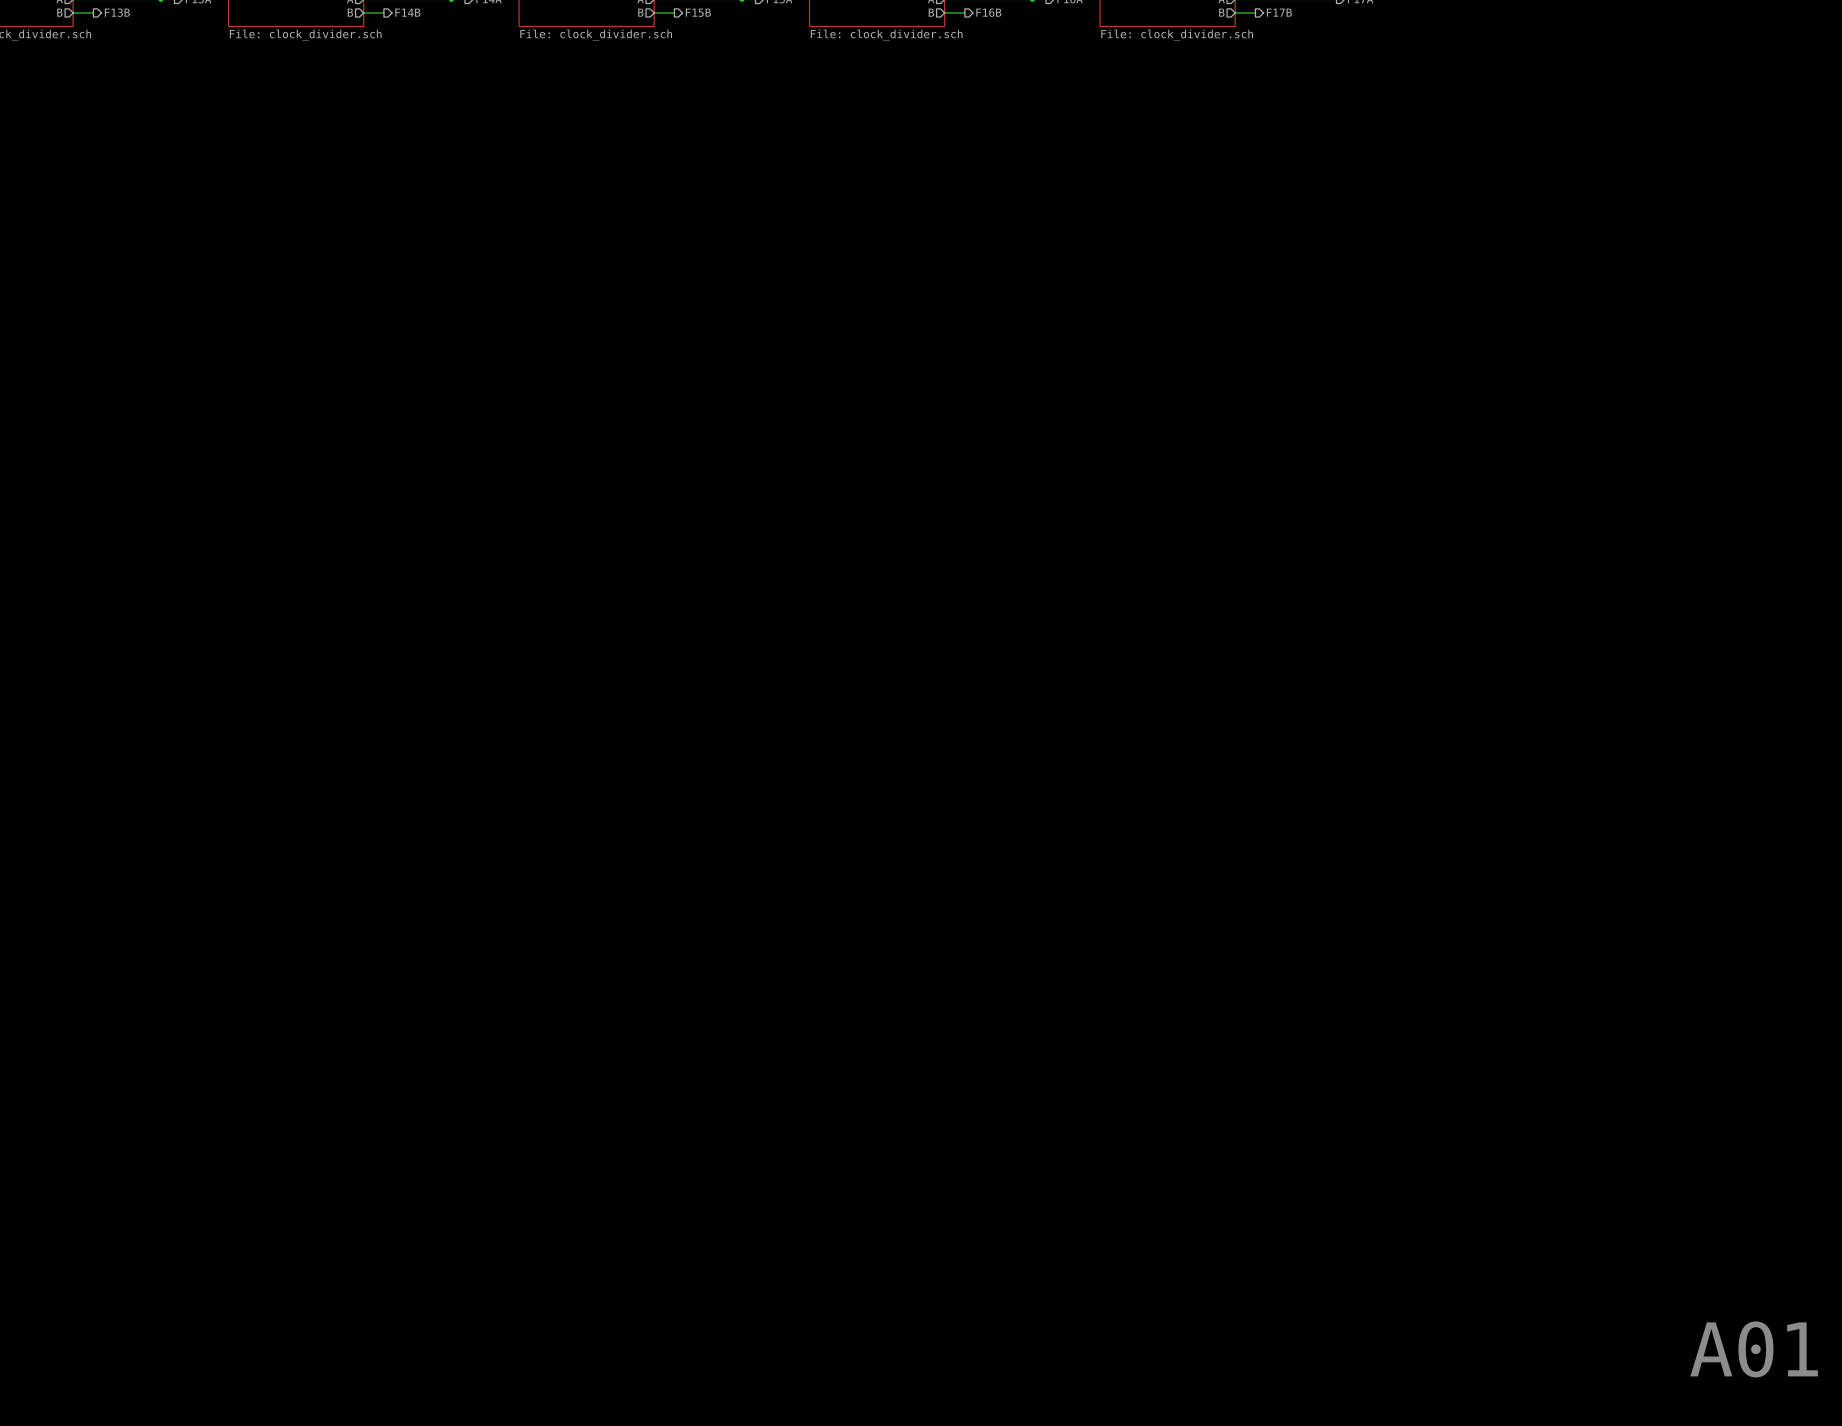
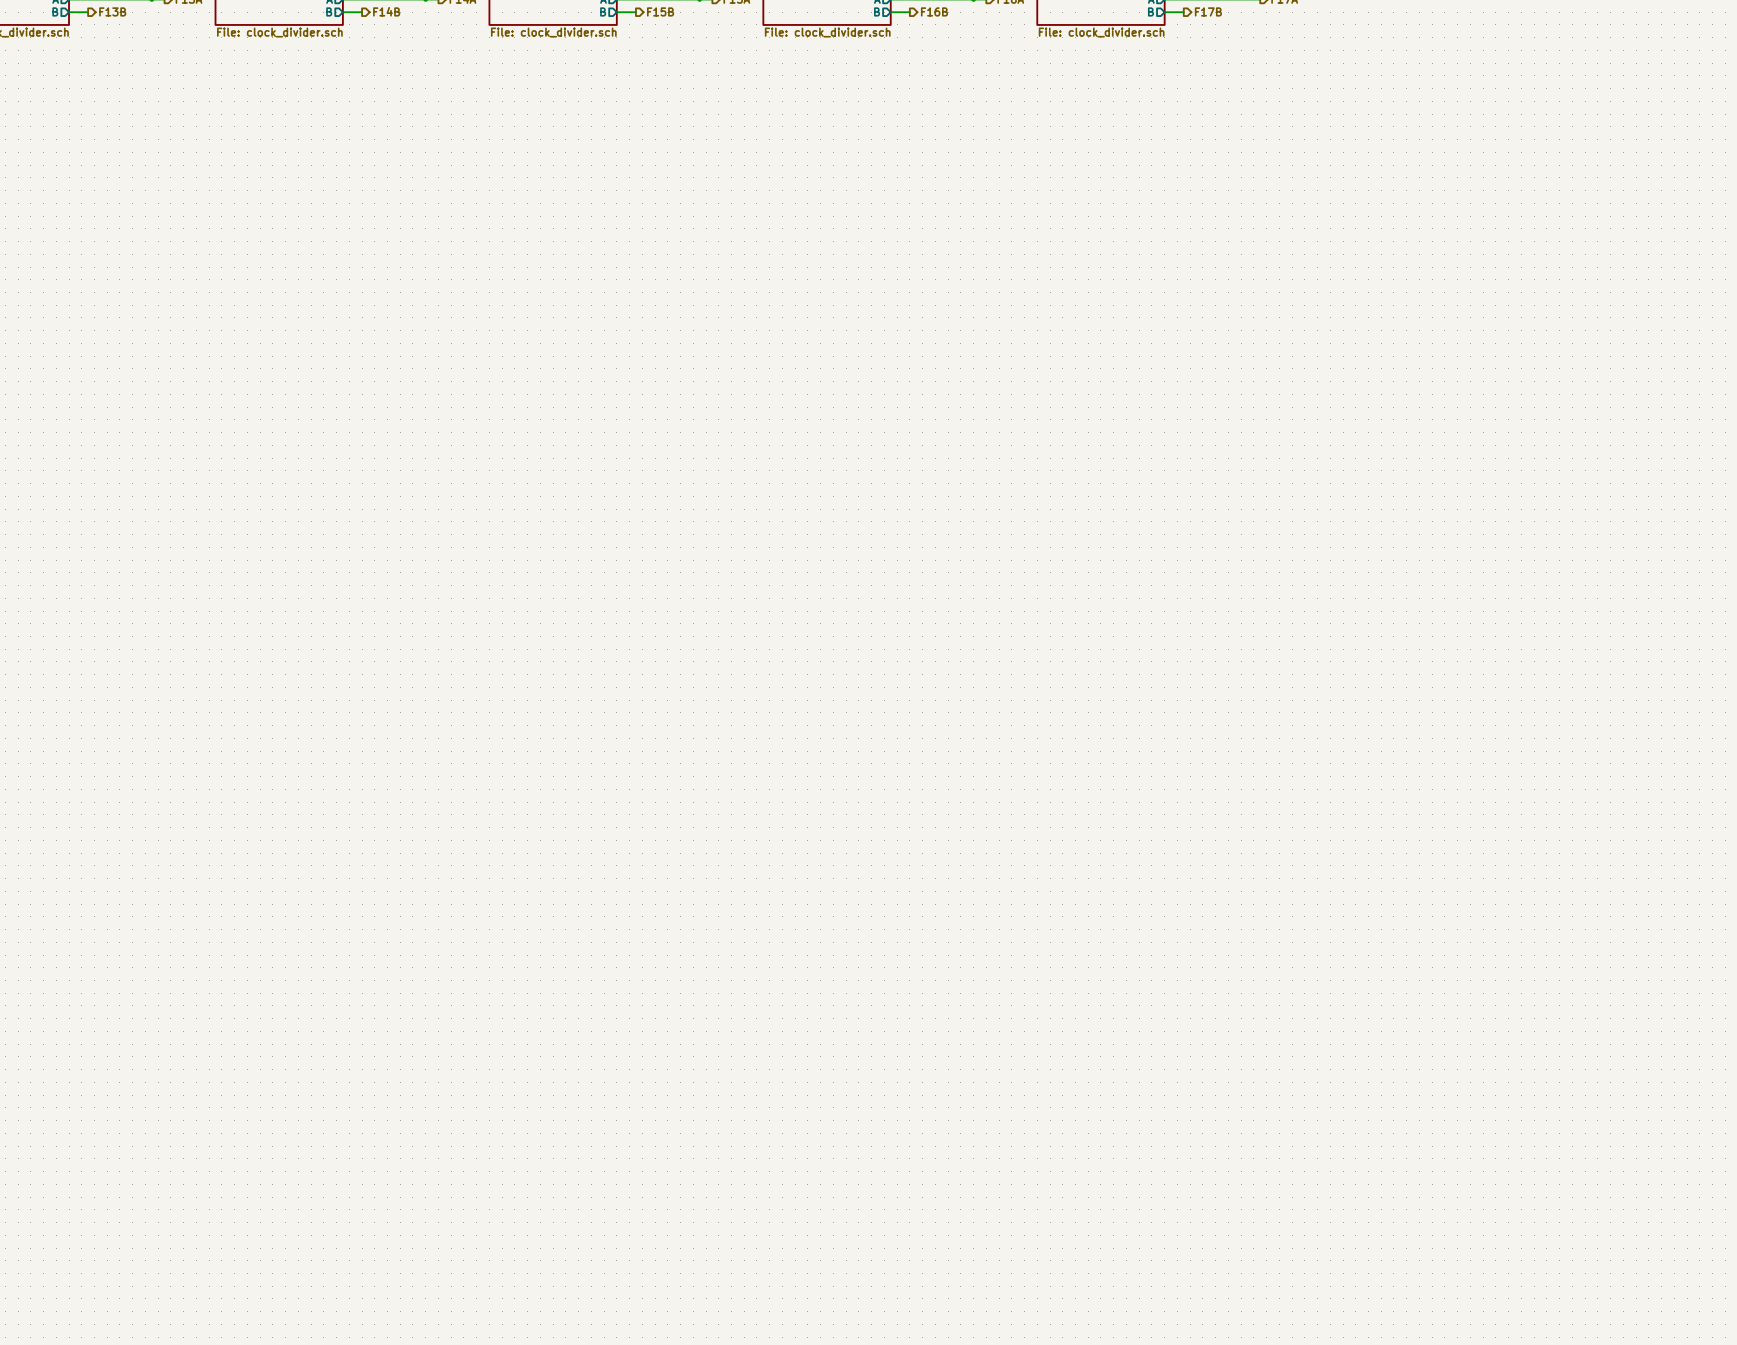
text: A01 (1754, 1349) -> none

